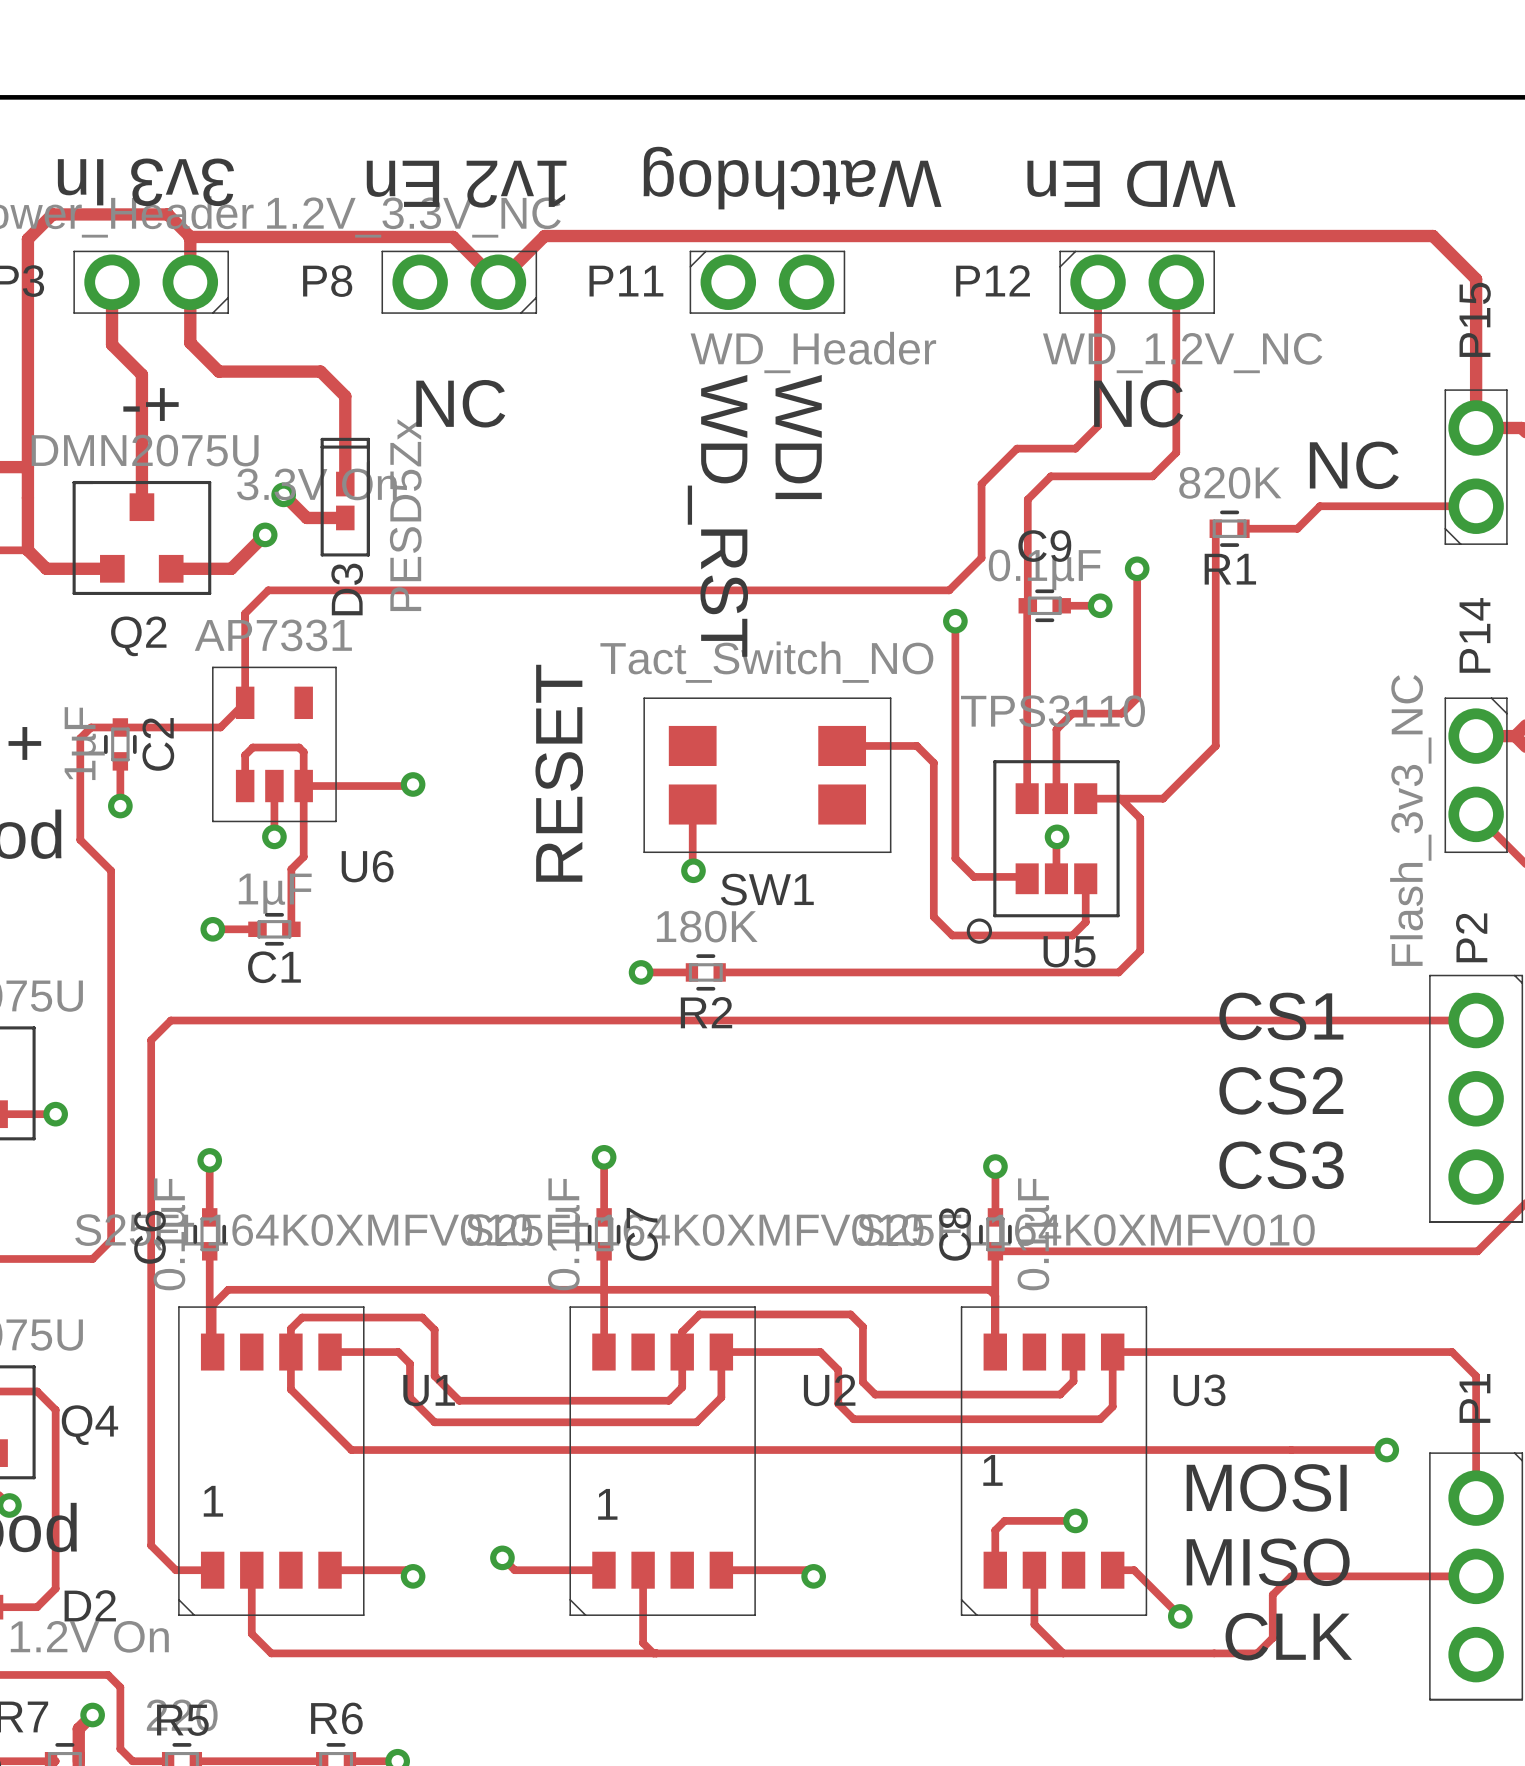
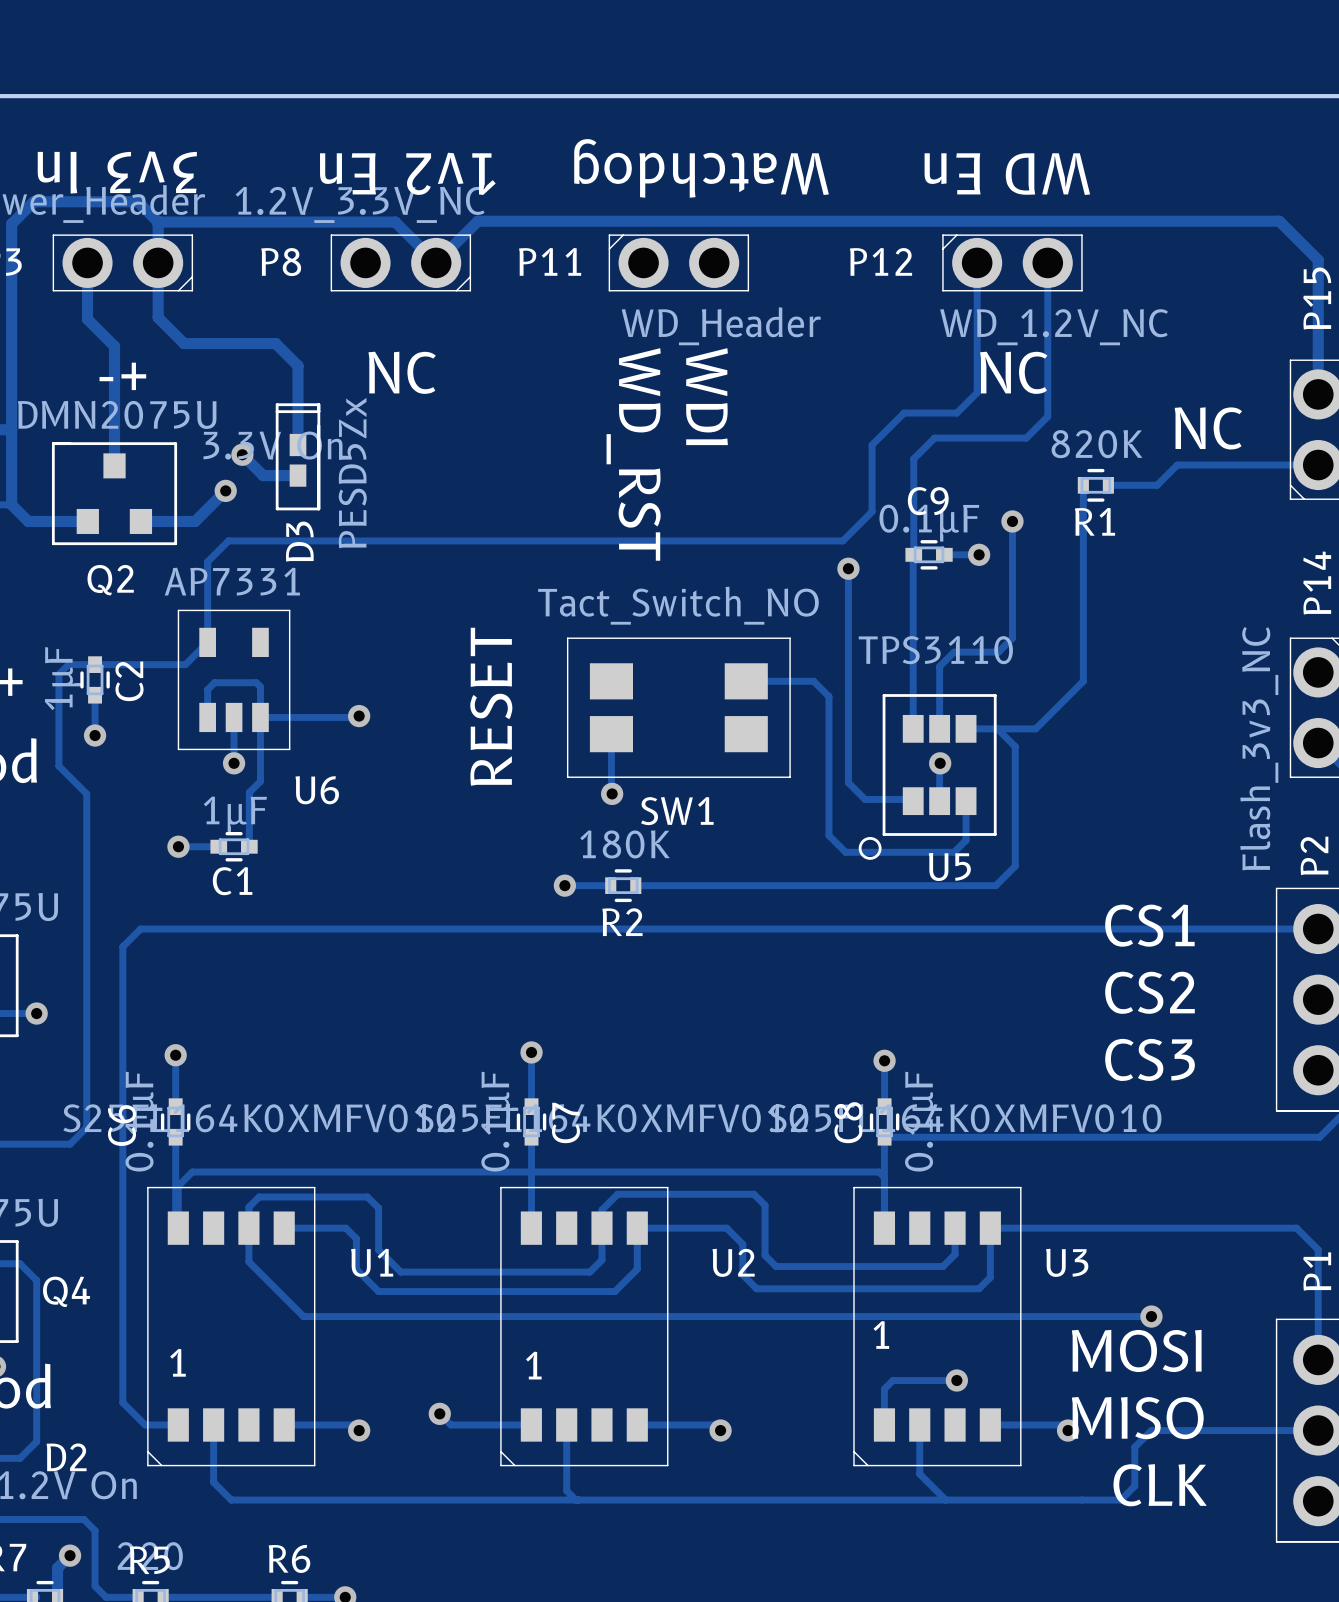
track: (1291, 1450) (1386, 1450) -> none
via position: (1386, 1450) -> (1151, 1316)
track: (1134, 1570) (1180, 1616) -> (1009, 1424) (1062, 1424) (1068, 1430)
via position: (1180, 1616) -> (1068, 1430)

